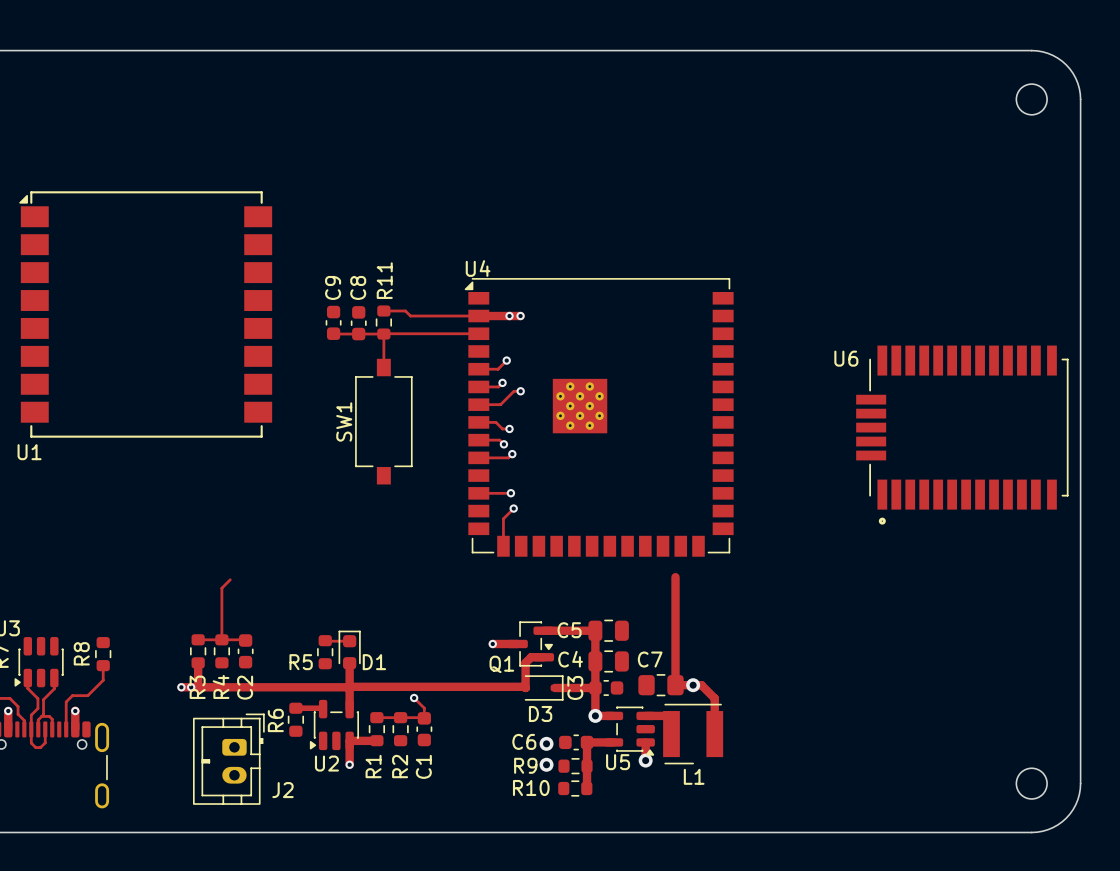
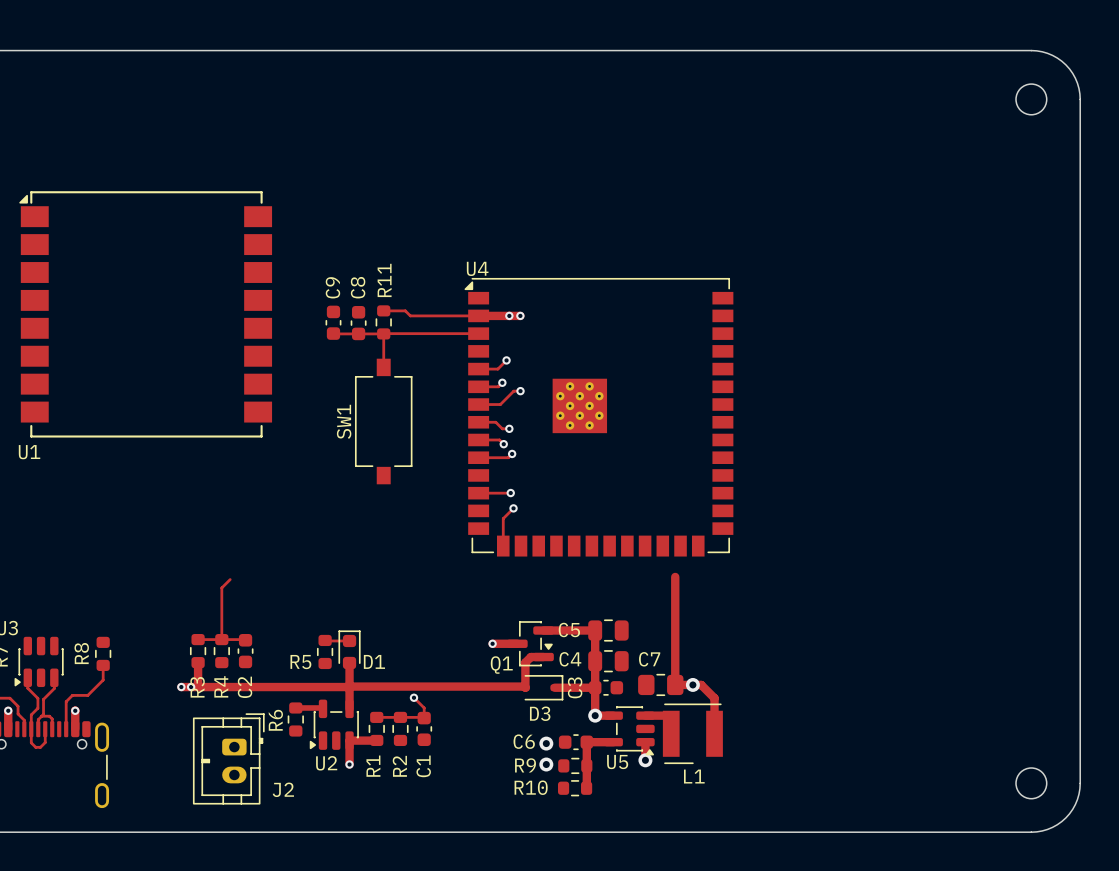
U6: (962, 435) -> none

